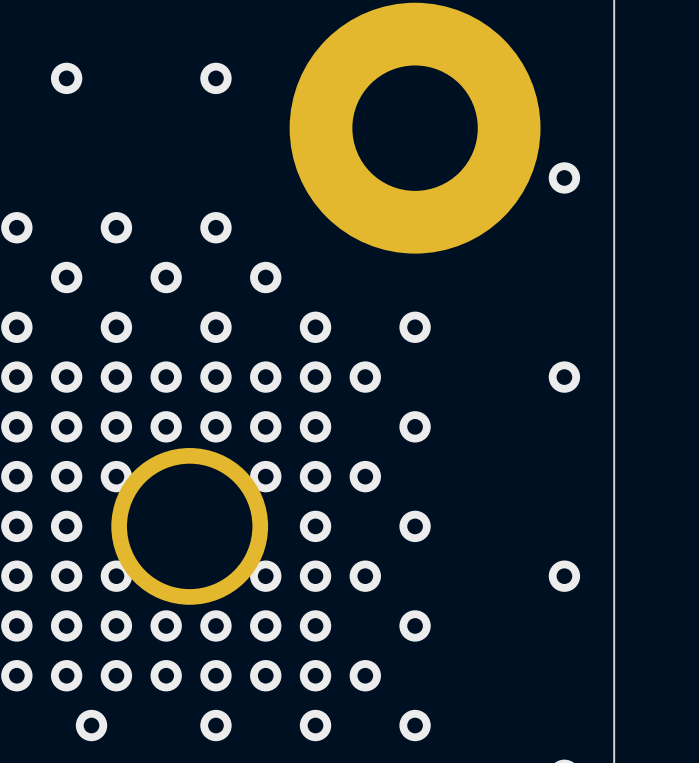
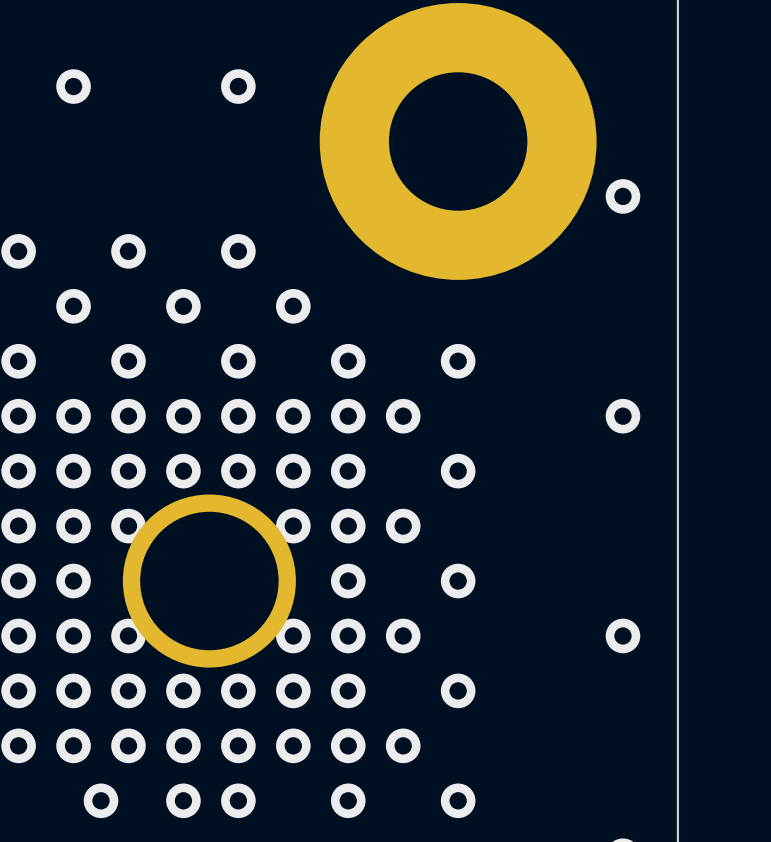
via: none -> (183, 800)

